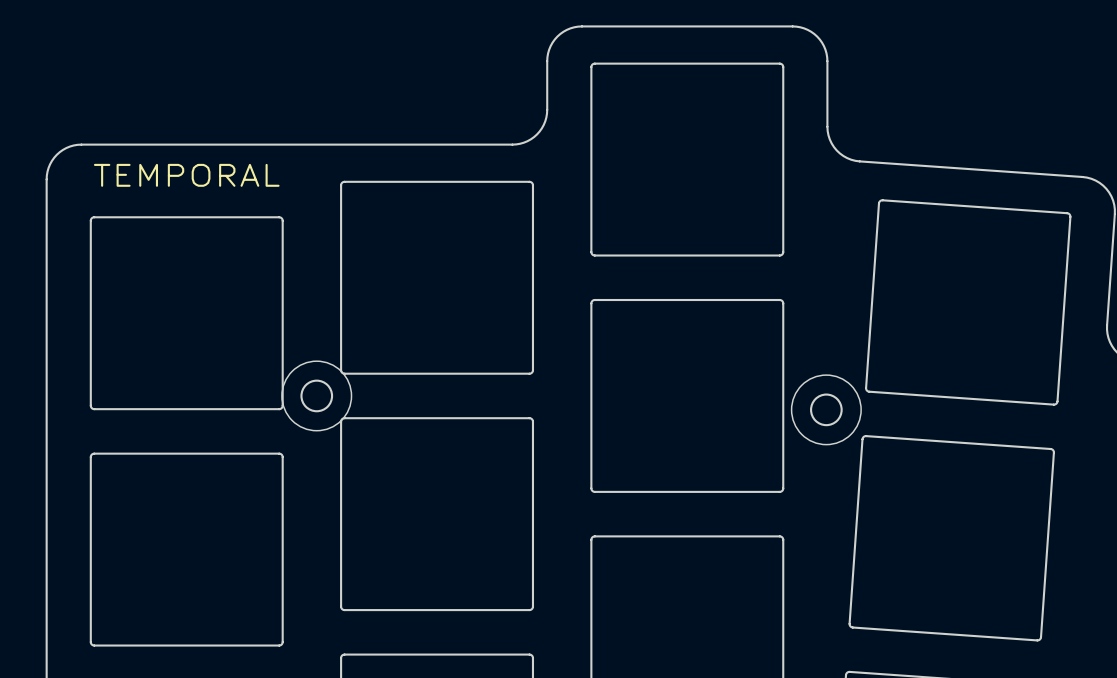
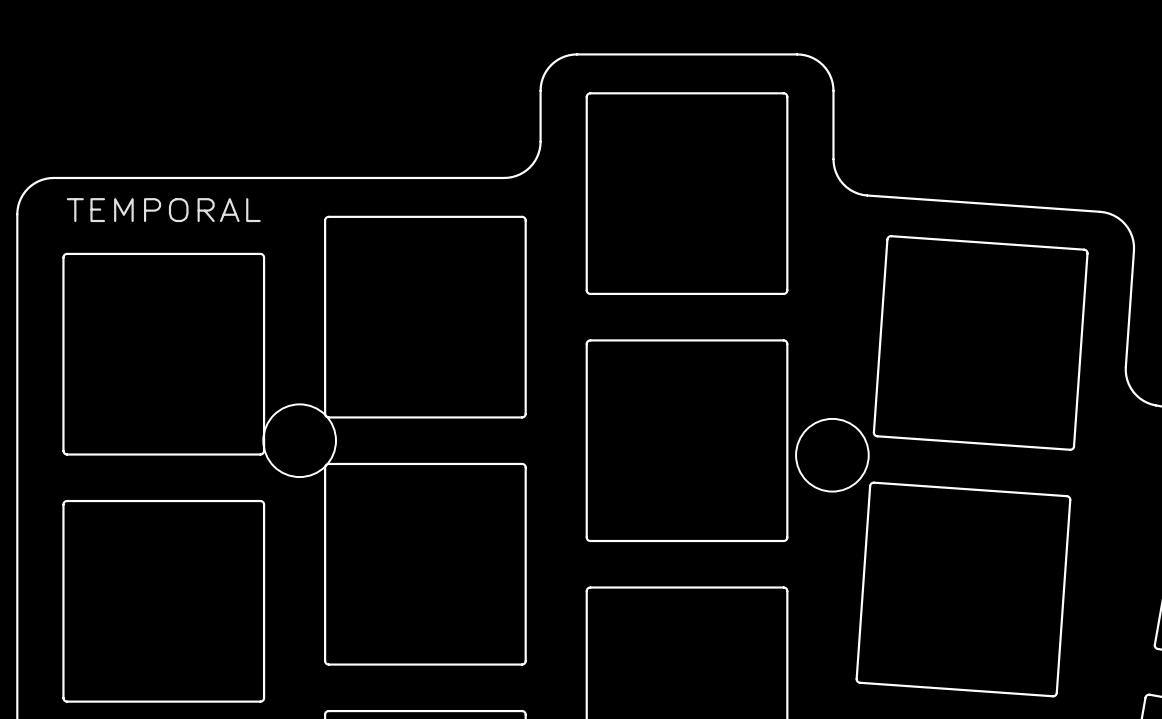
round board edge: [300, 379, 334, 413] -> none
round board edge: [810, 393, 843, 427] -> none

